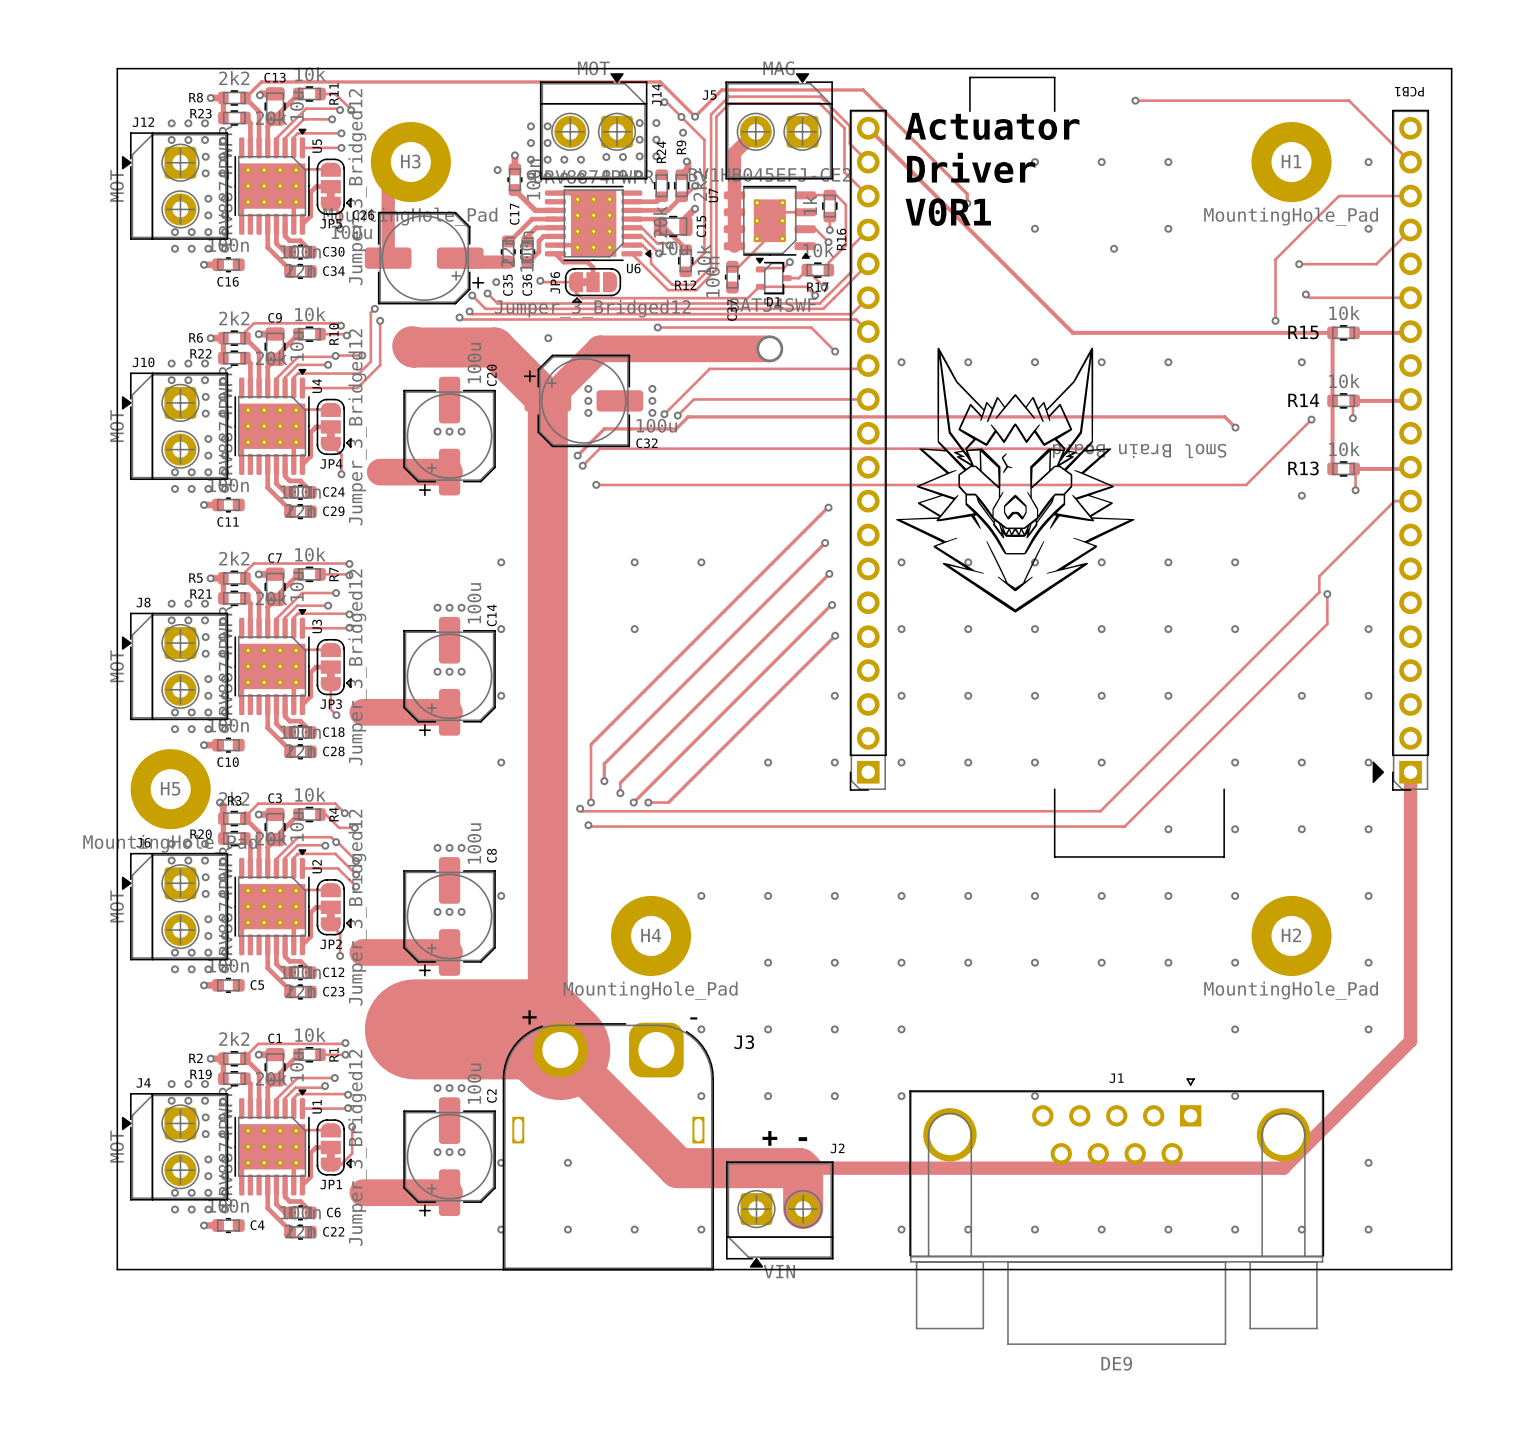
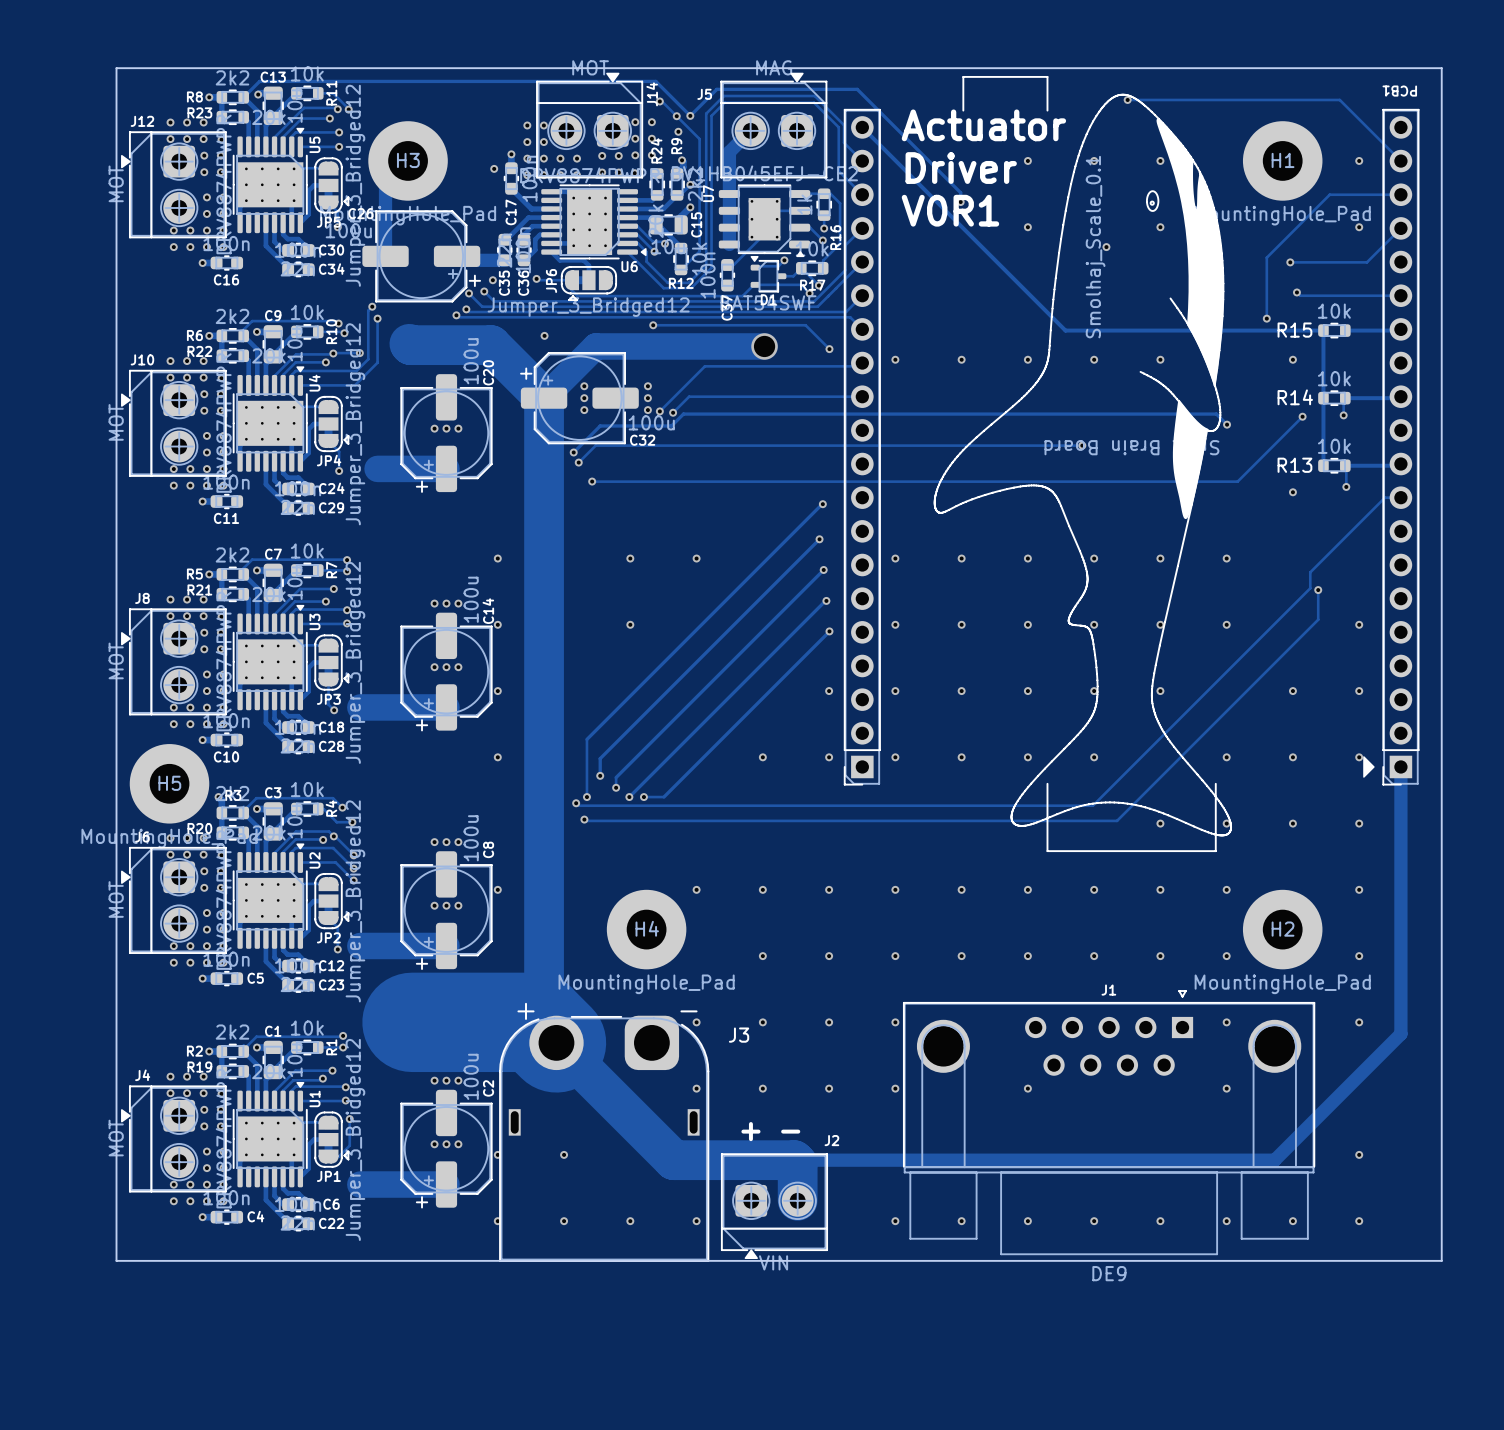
drawing: none -> [933, 93, 1232, 837]
drawing: [896, 347, 1135, 613] -> none
J1 position: (1116, 1211) -> (1109, 1122)

